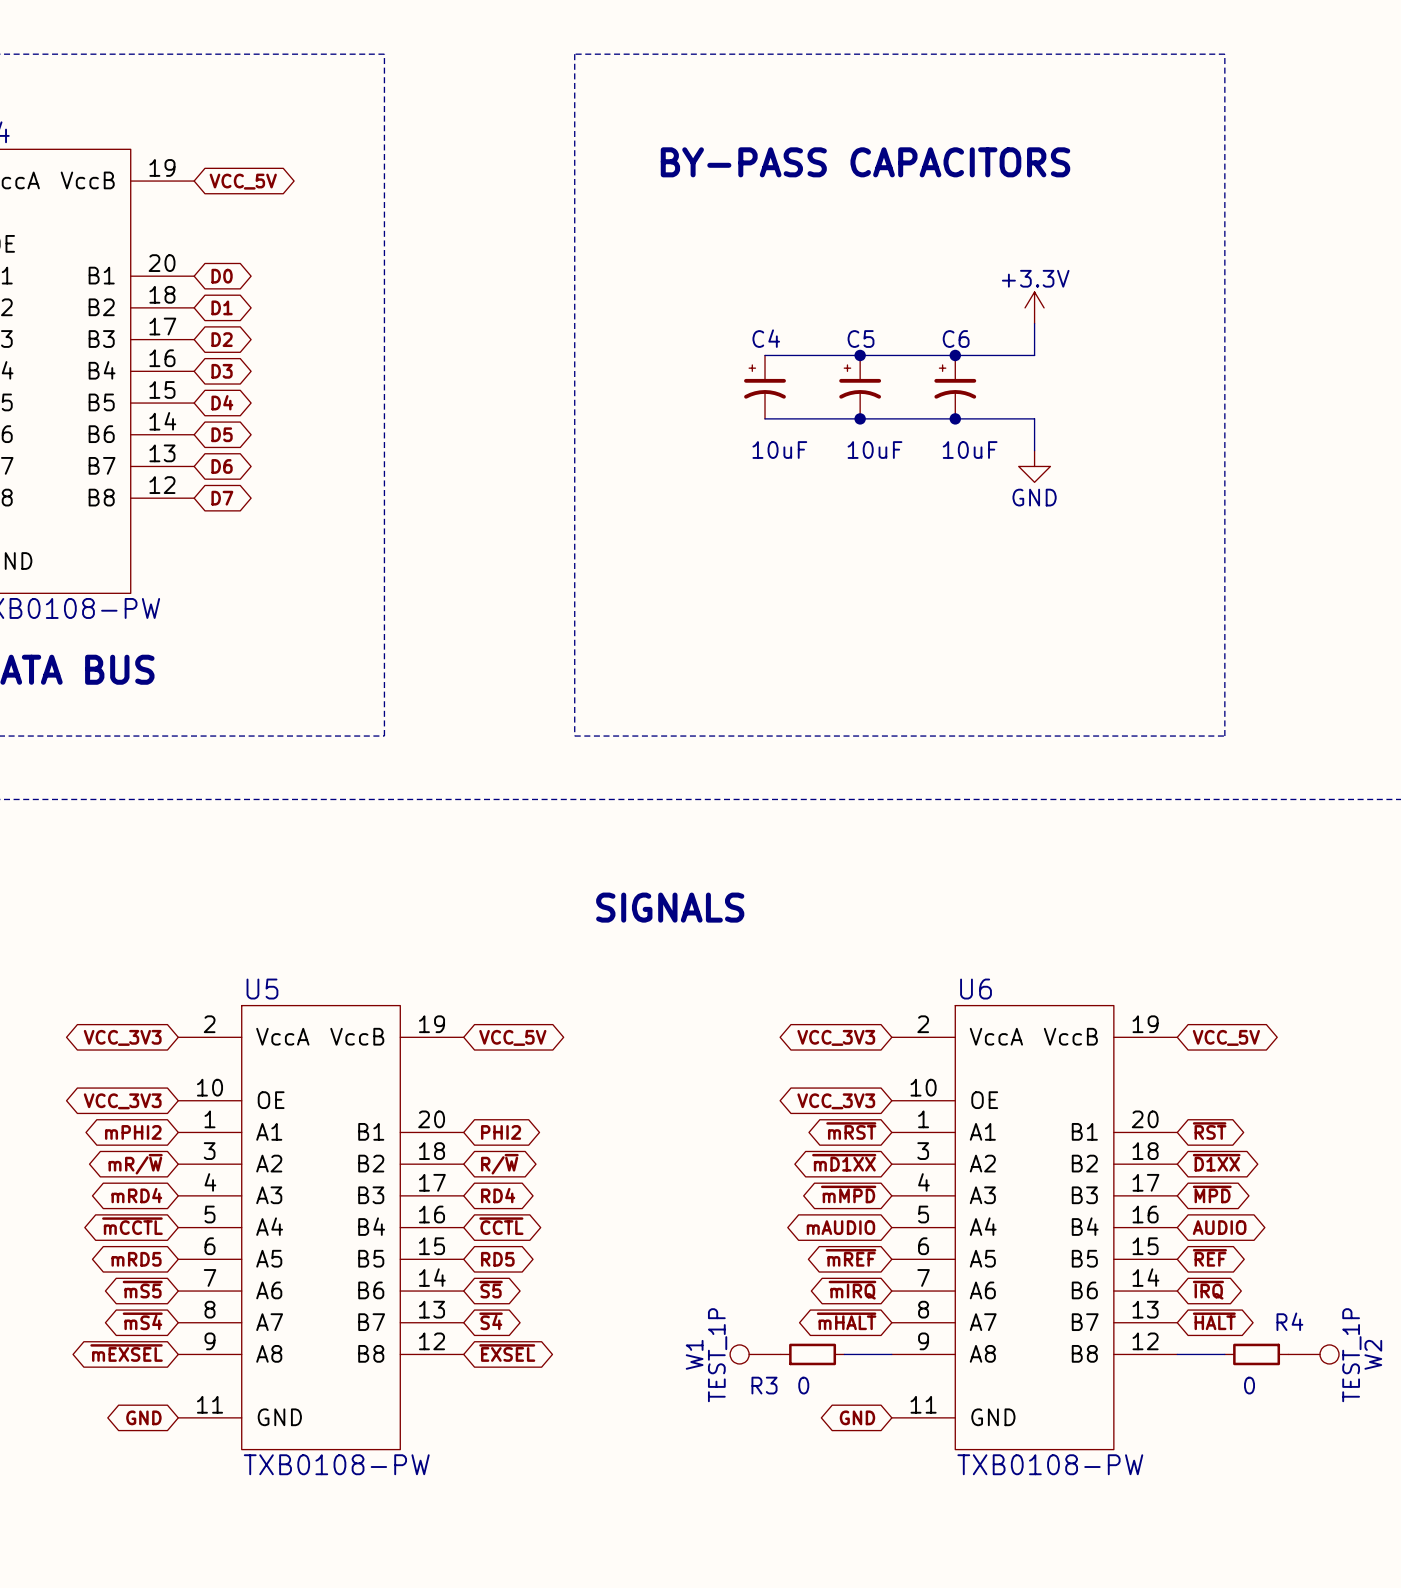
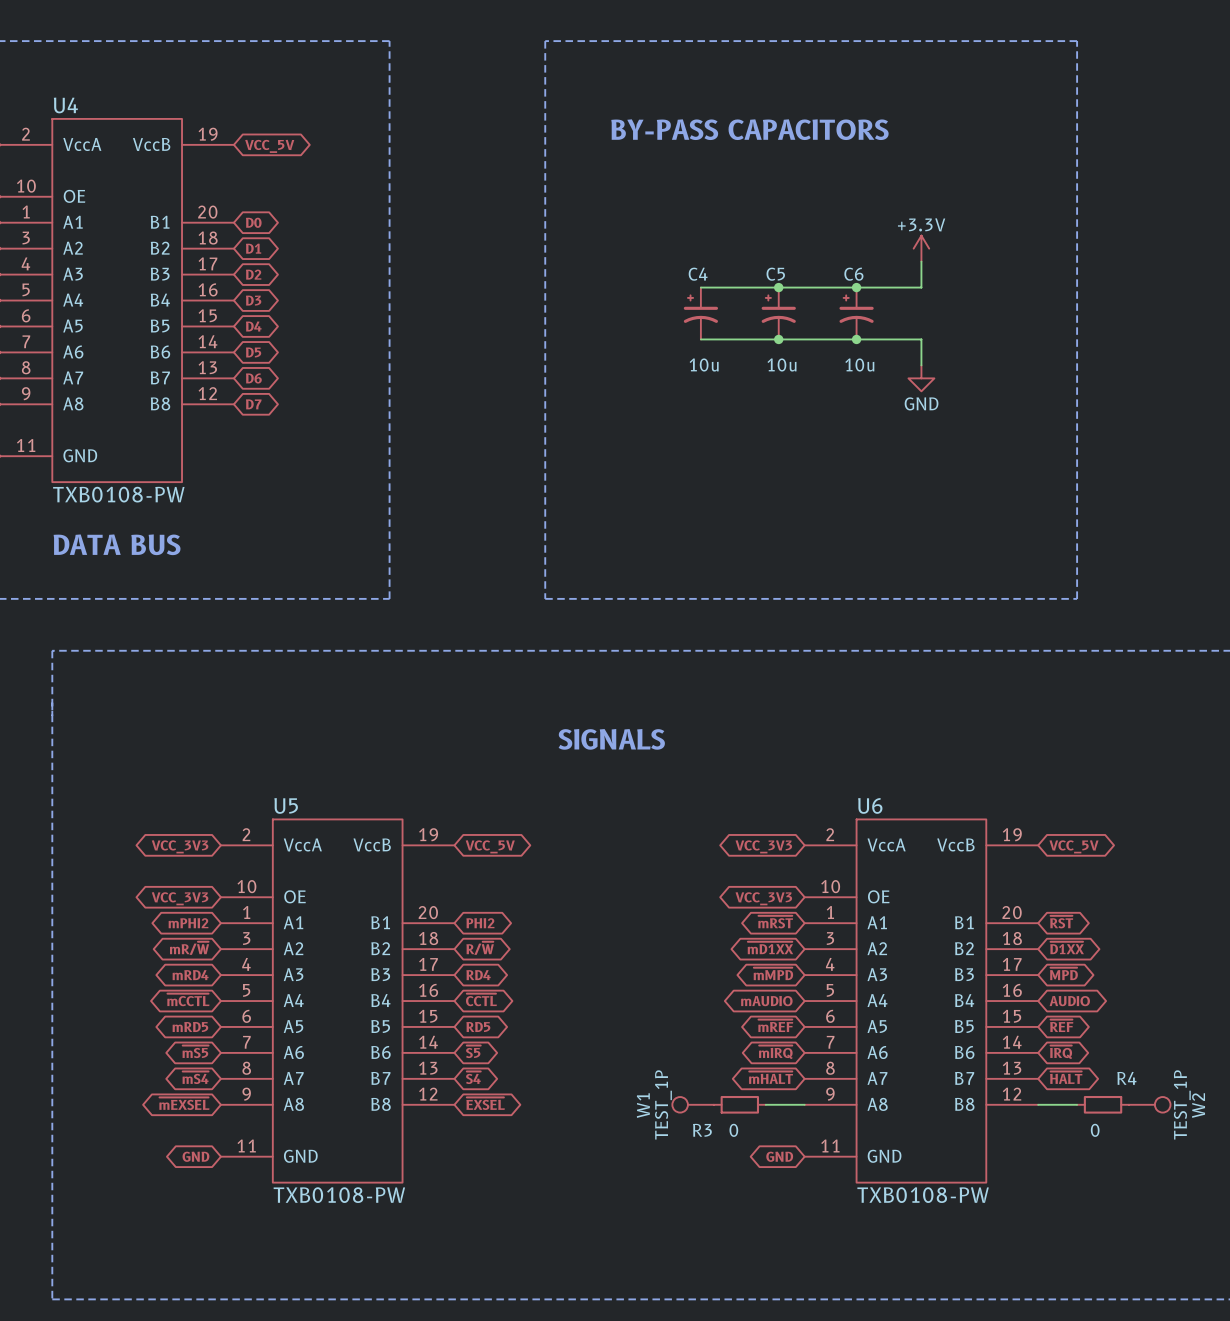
C4 value: 10uF (779, 450) -> 10u (704, 364)
C5 value: 10uF (874, 450) -> 10u (781, 364)
C6 value: 10uF (970, 450) -> 10u (859, 364)

